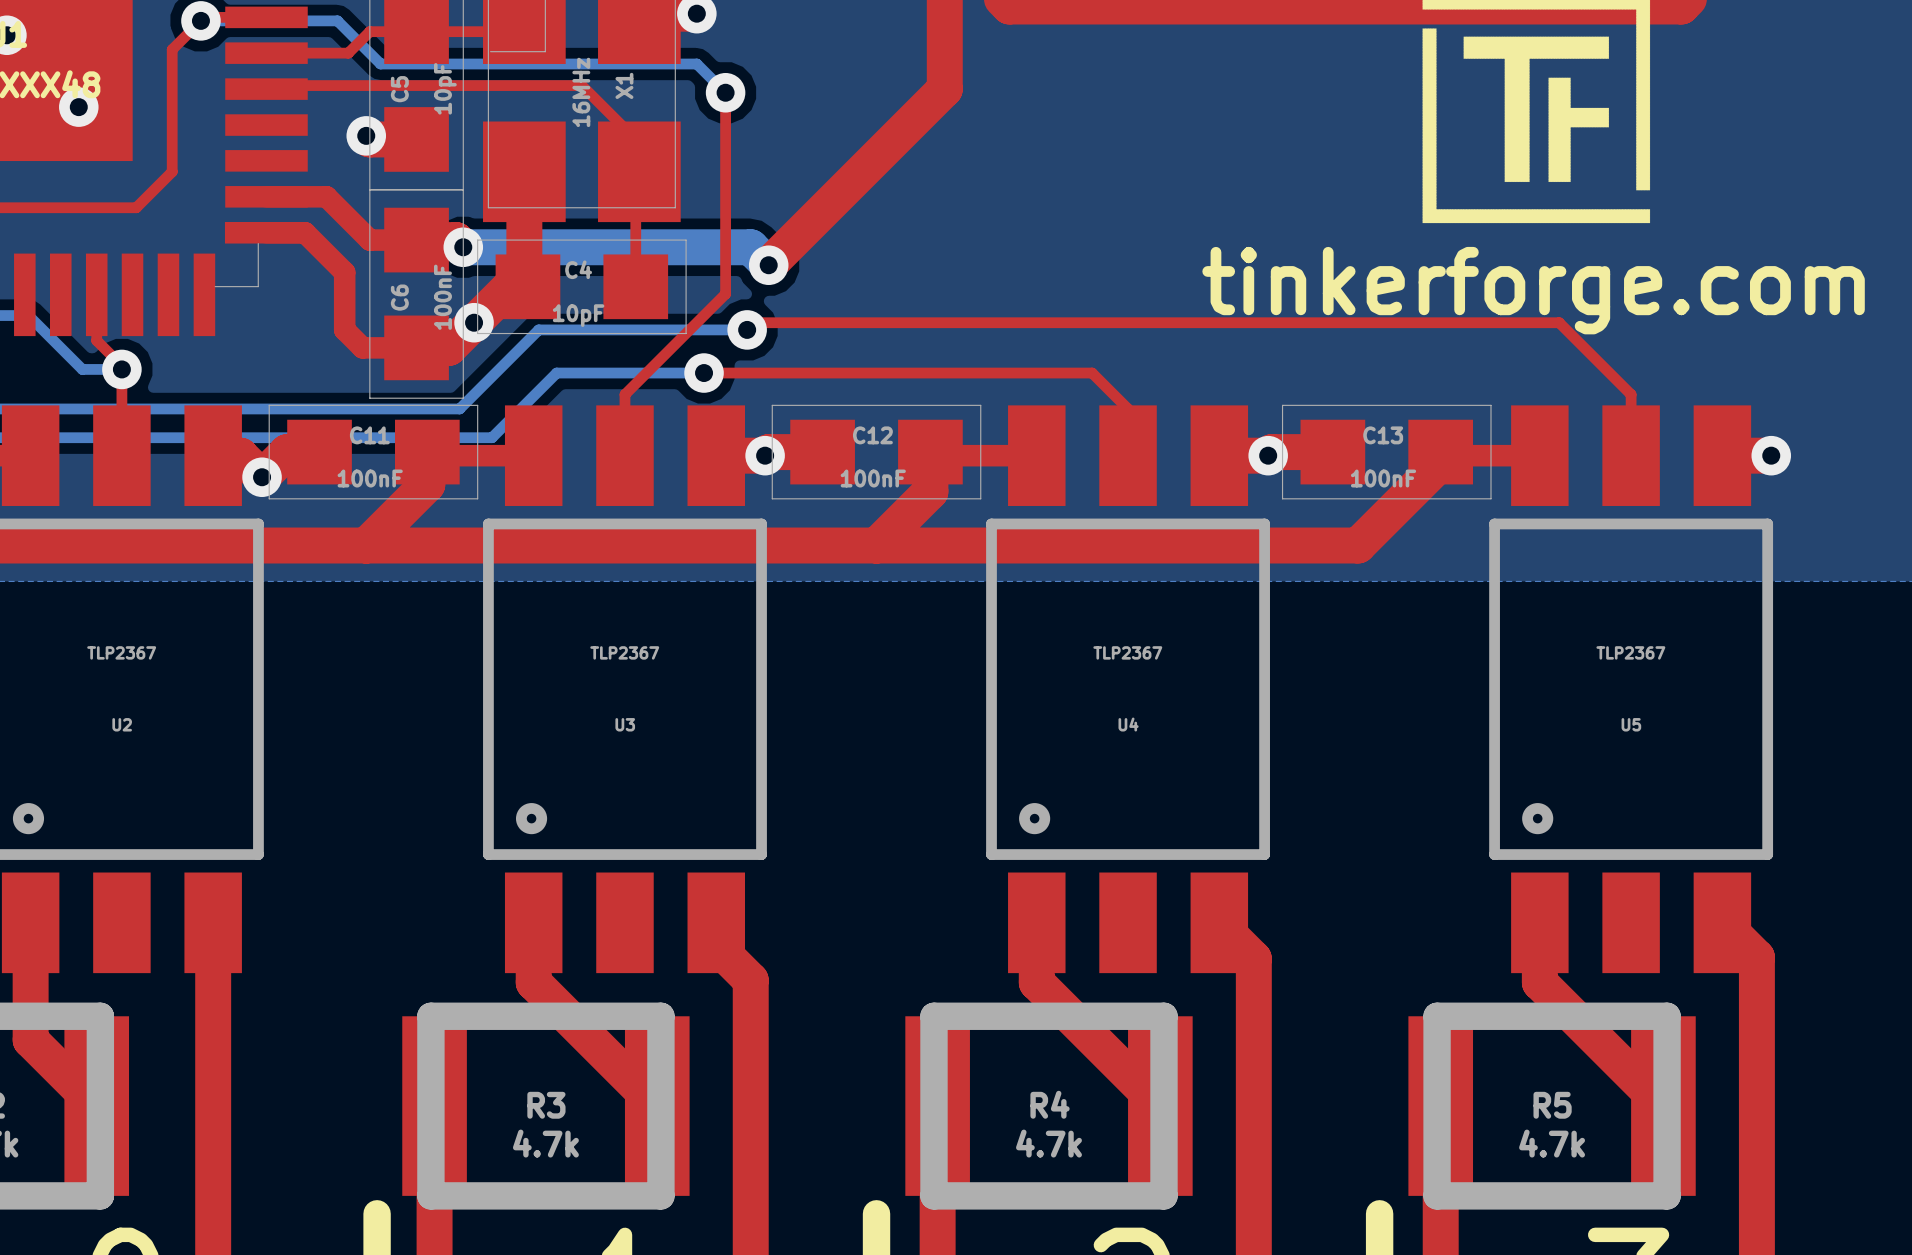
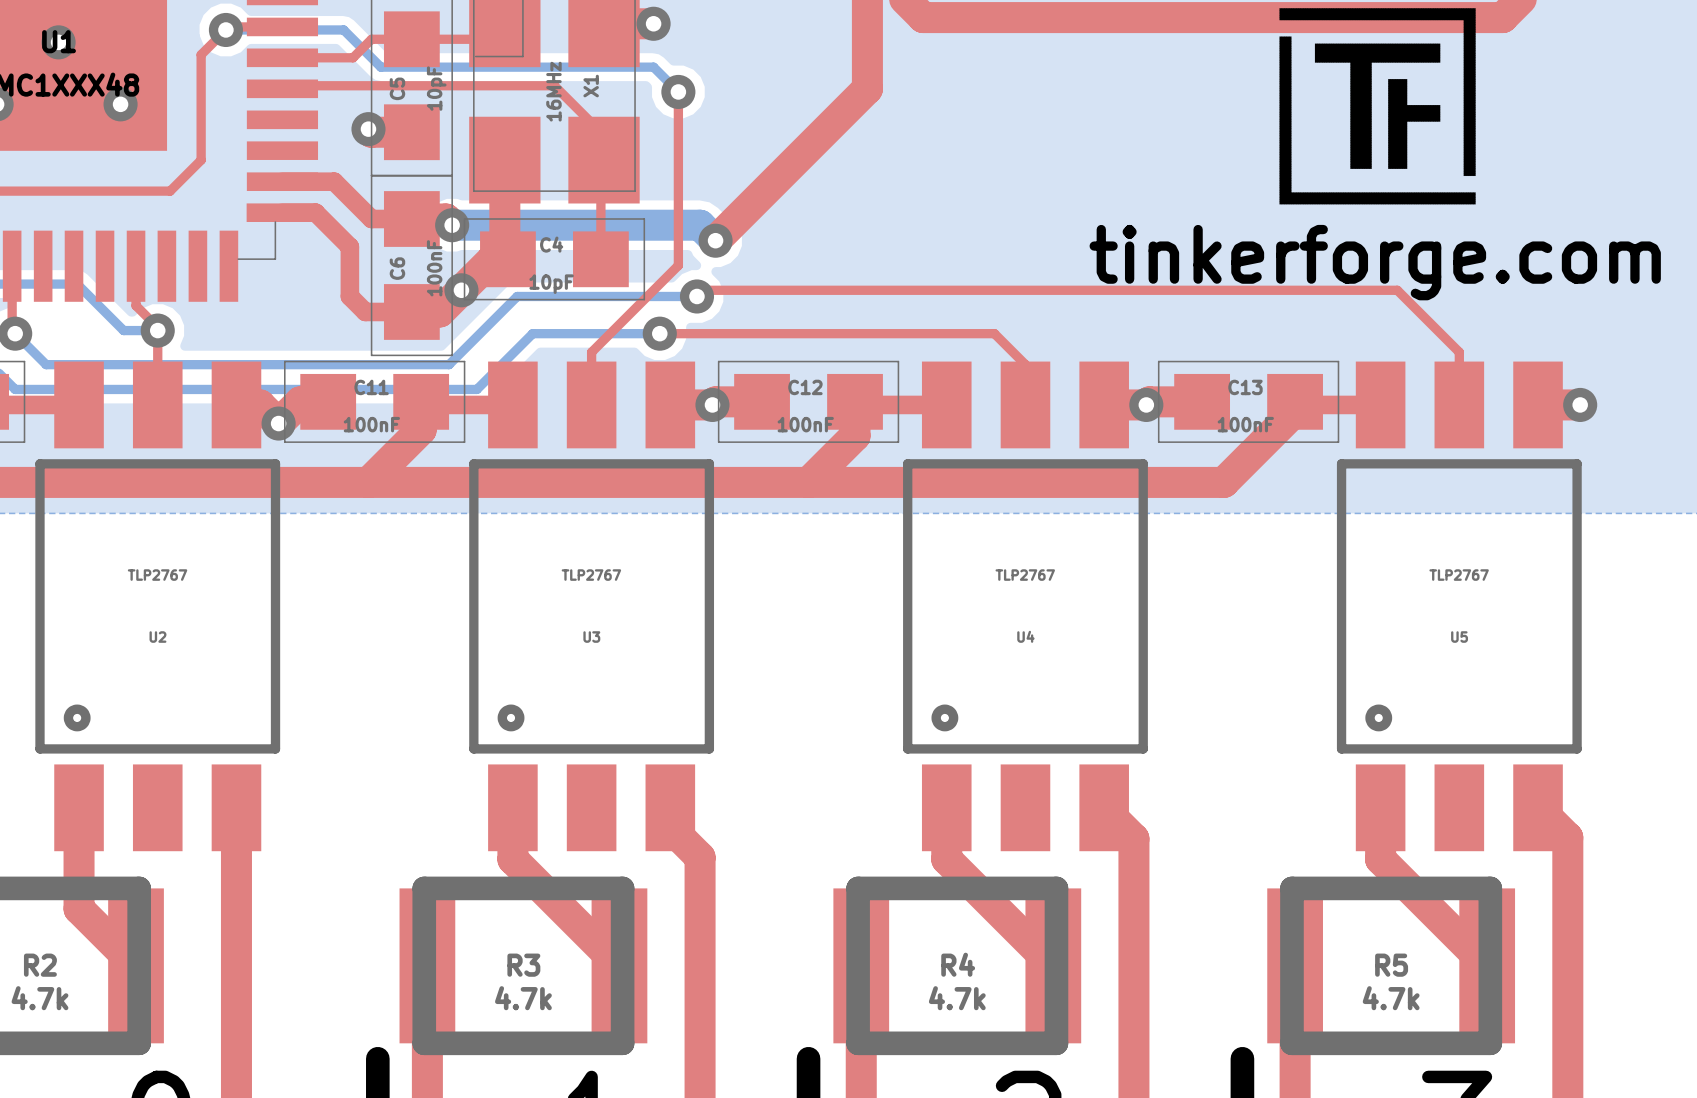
U2 value: TLP2367 (121, 652) -> TLP2767 (157, 575)
U3 value: TLP2367 (624, 652) -> TLP2767 (591, 575)
U4 value: TLP2367 (1127, 652) -> TLP2767 (1025, 575)
U5 value: TLP2367 (1630, 652) -> TLP2767 (1459, 575)

